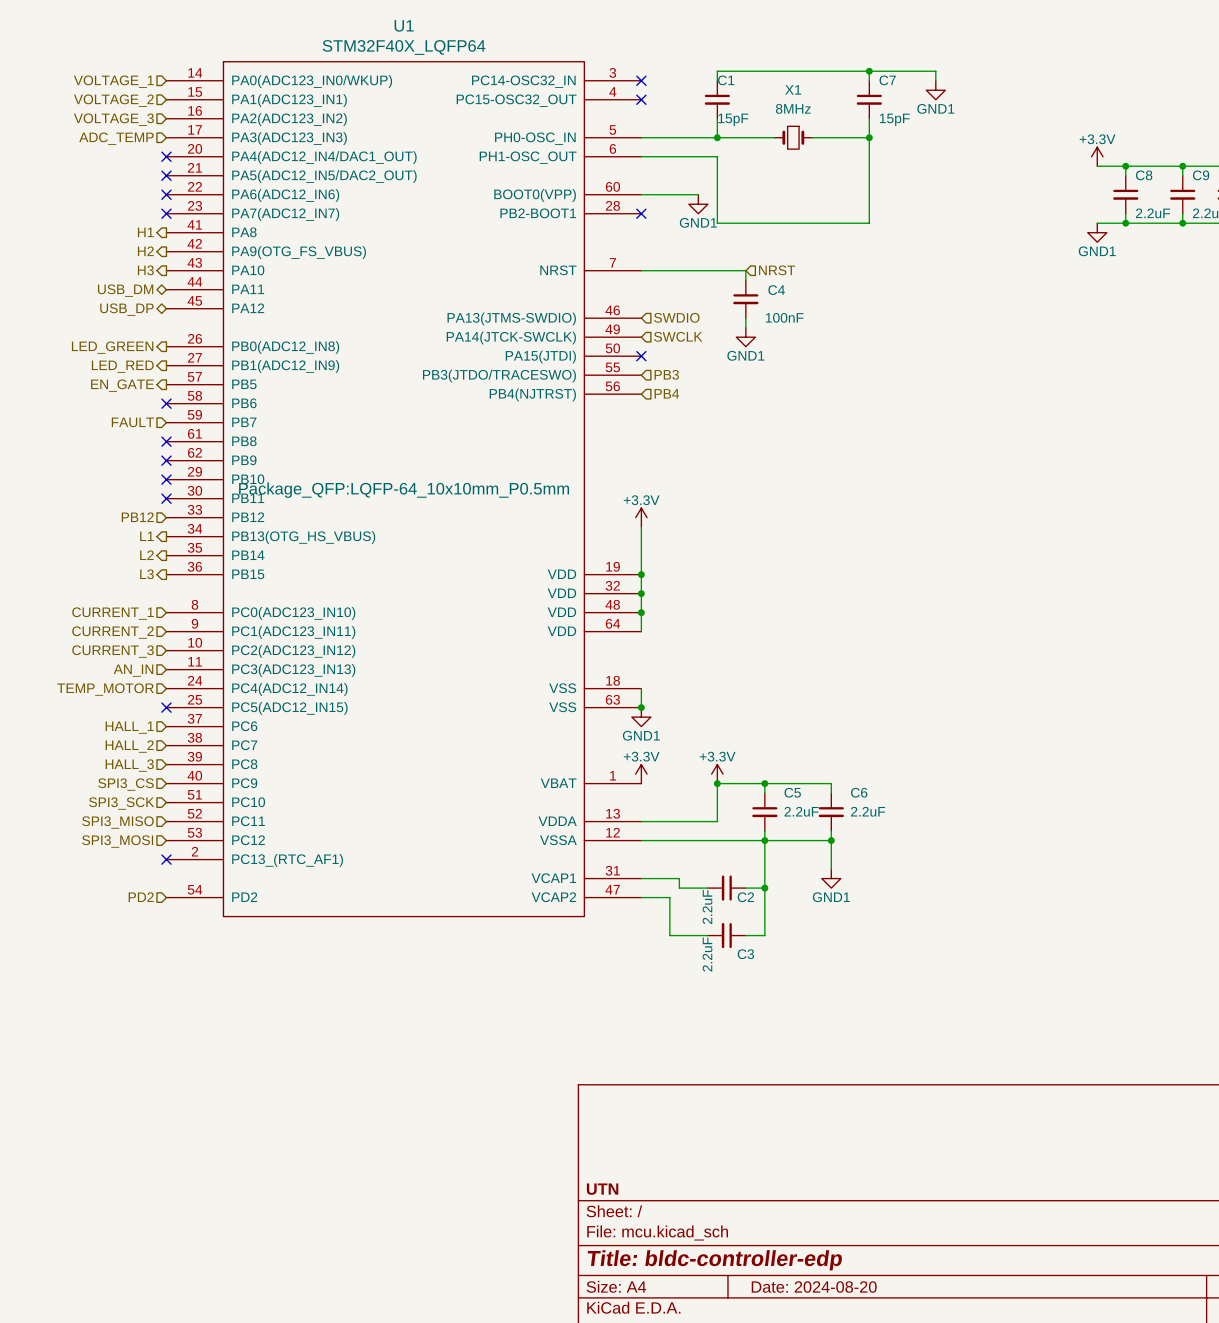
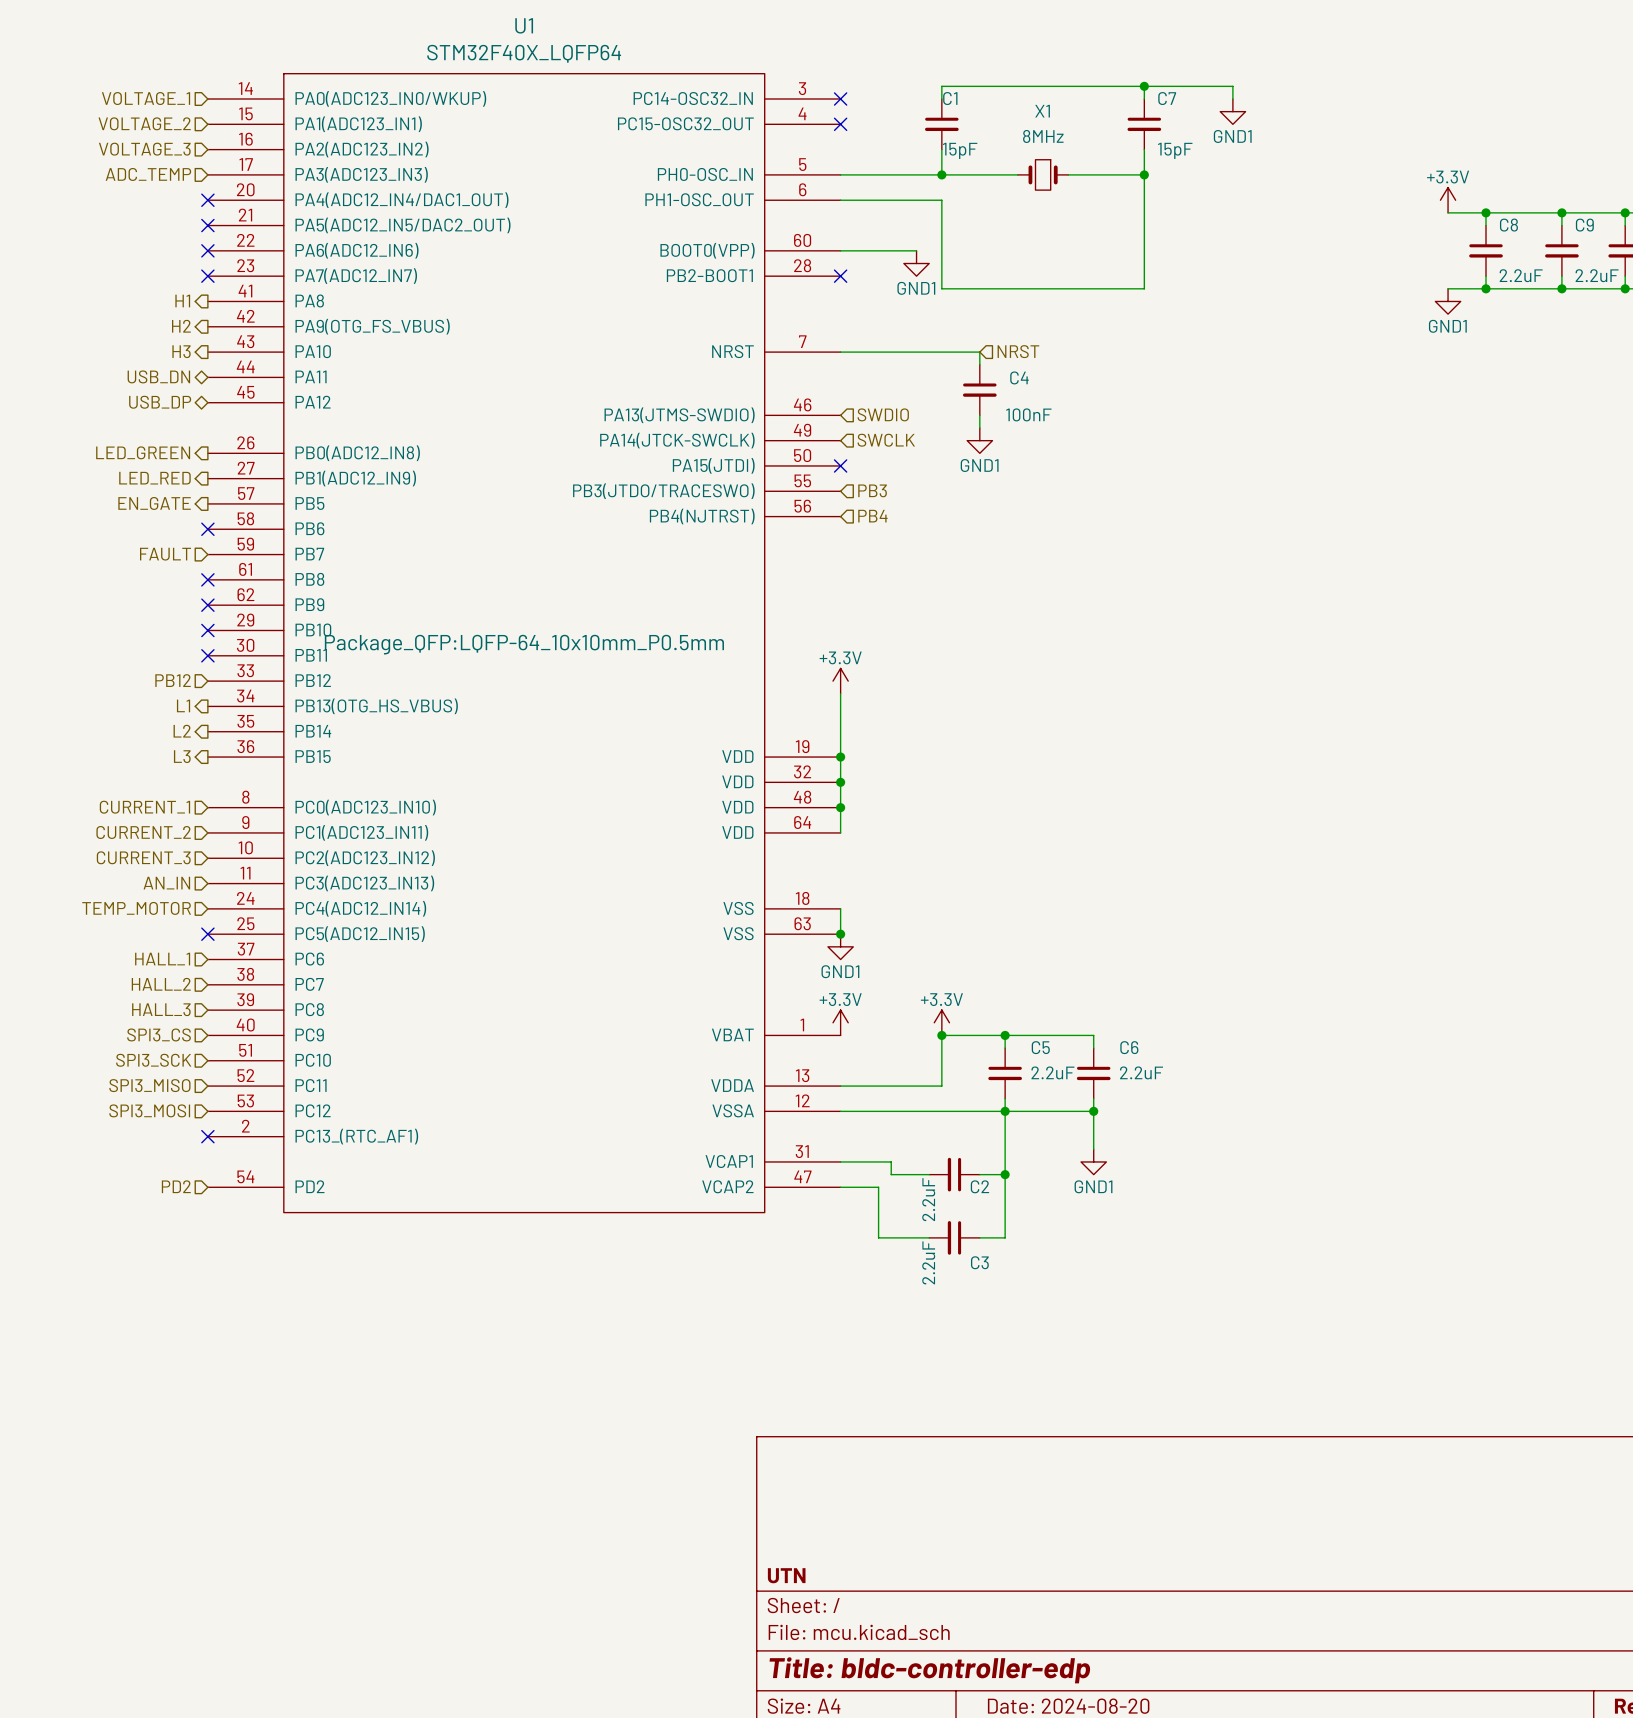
hierarchical label: USB_DM (125, 290) -> USB_DN (158, 376)

